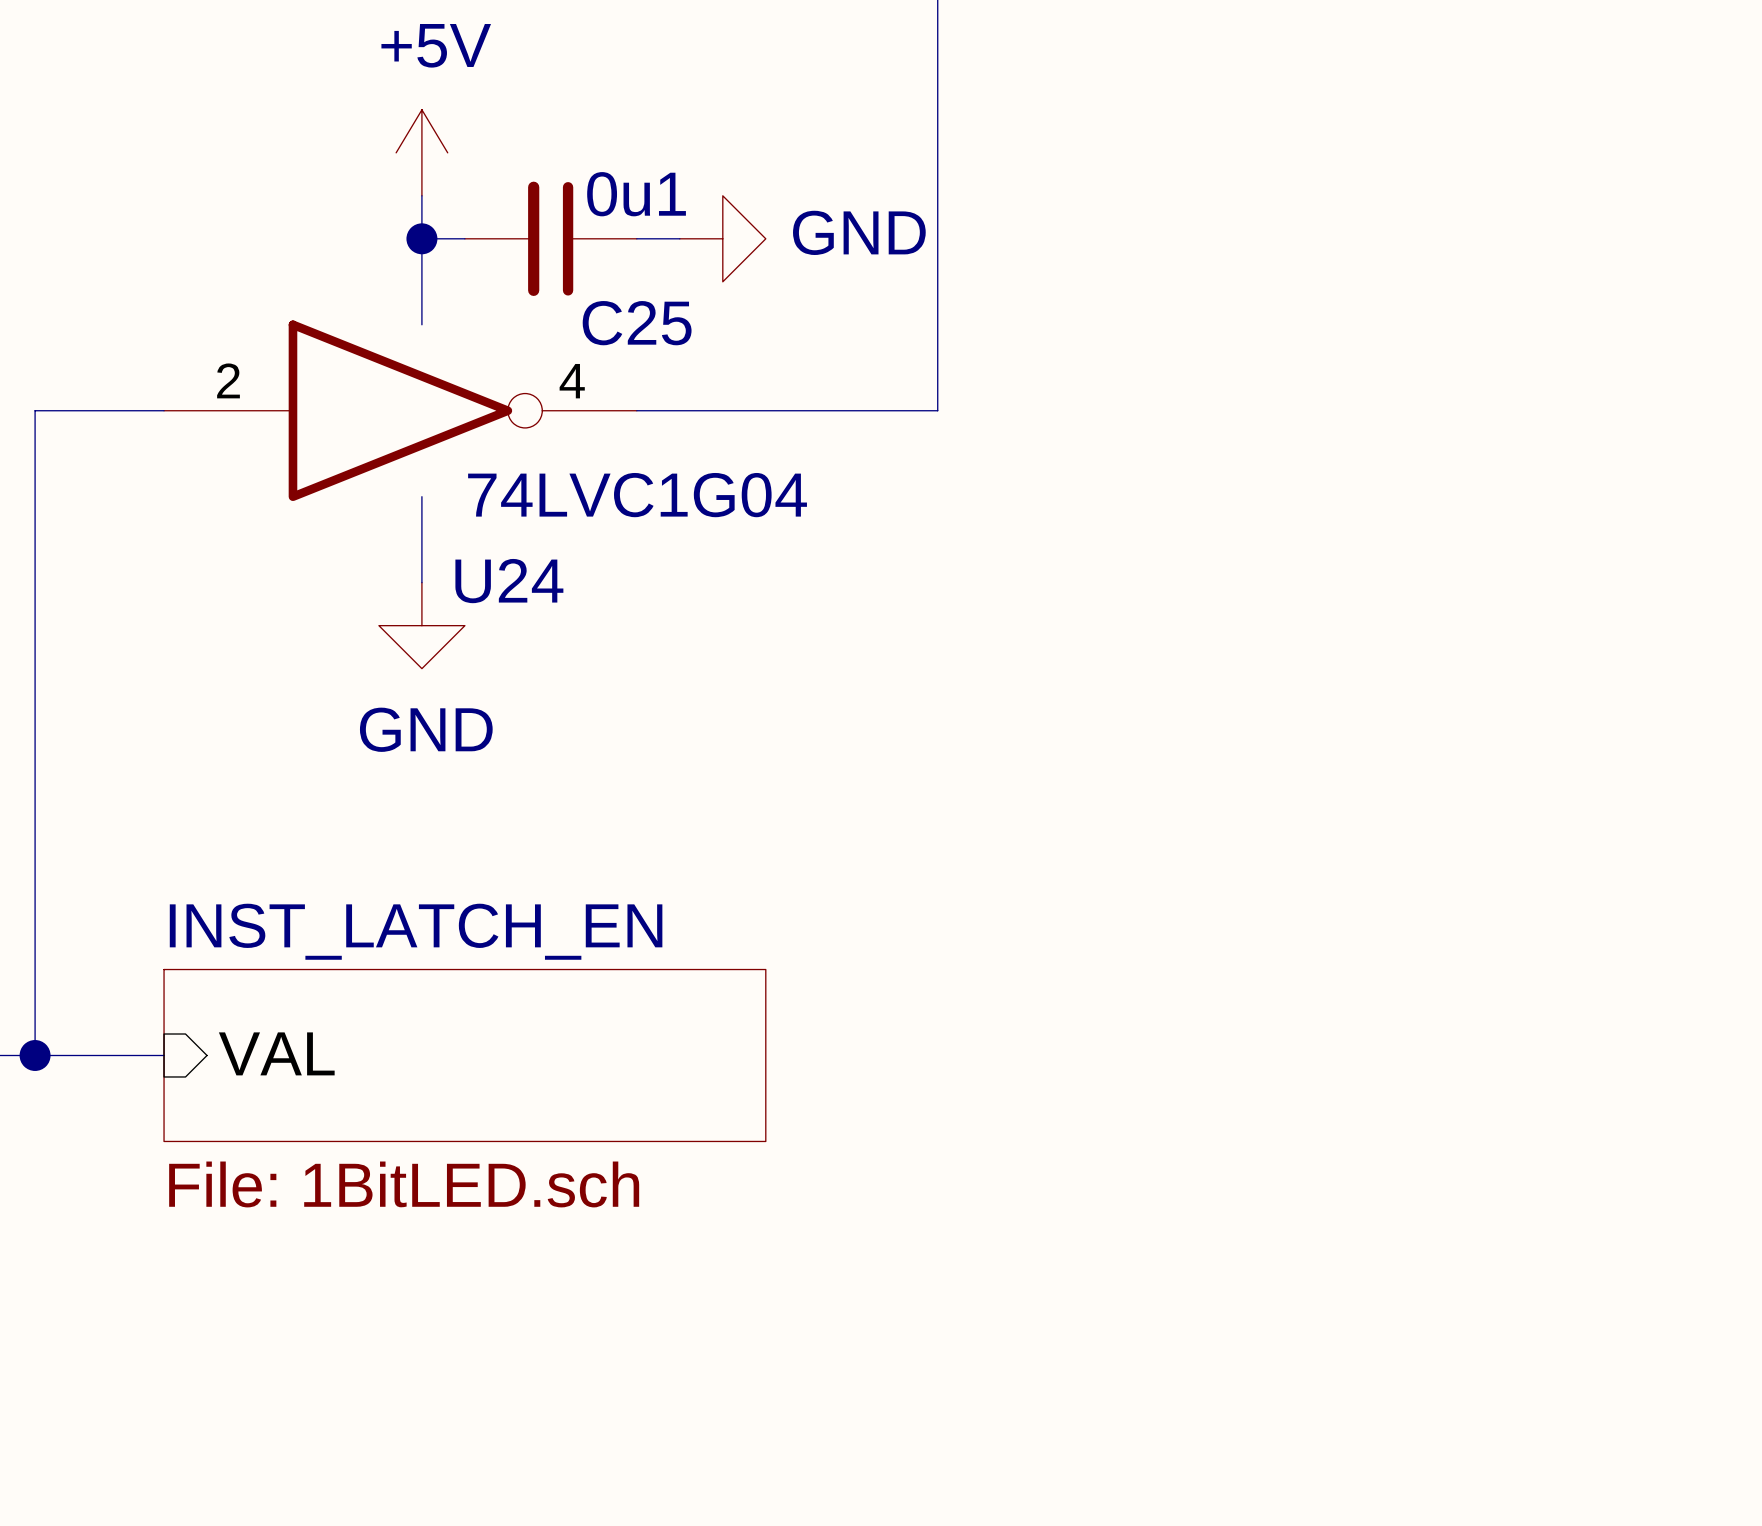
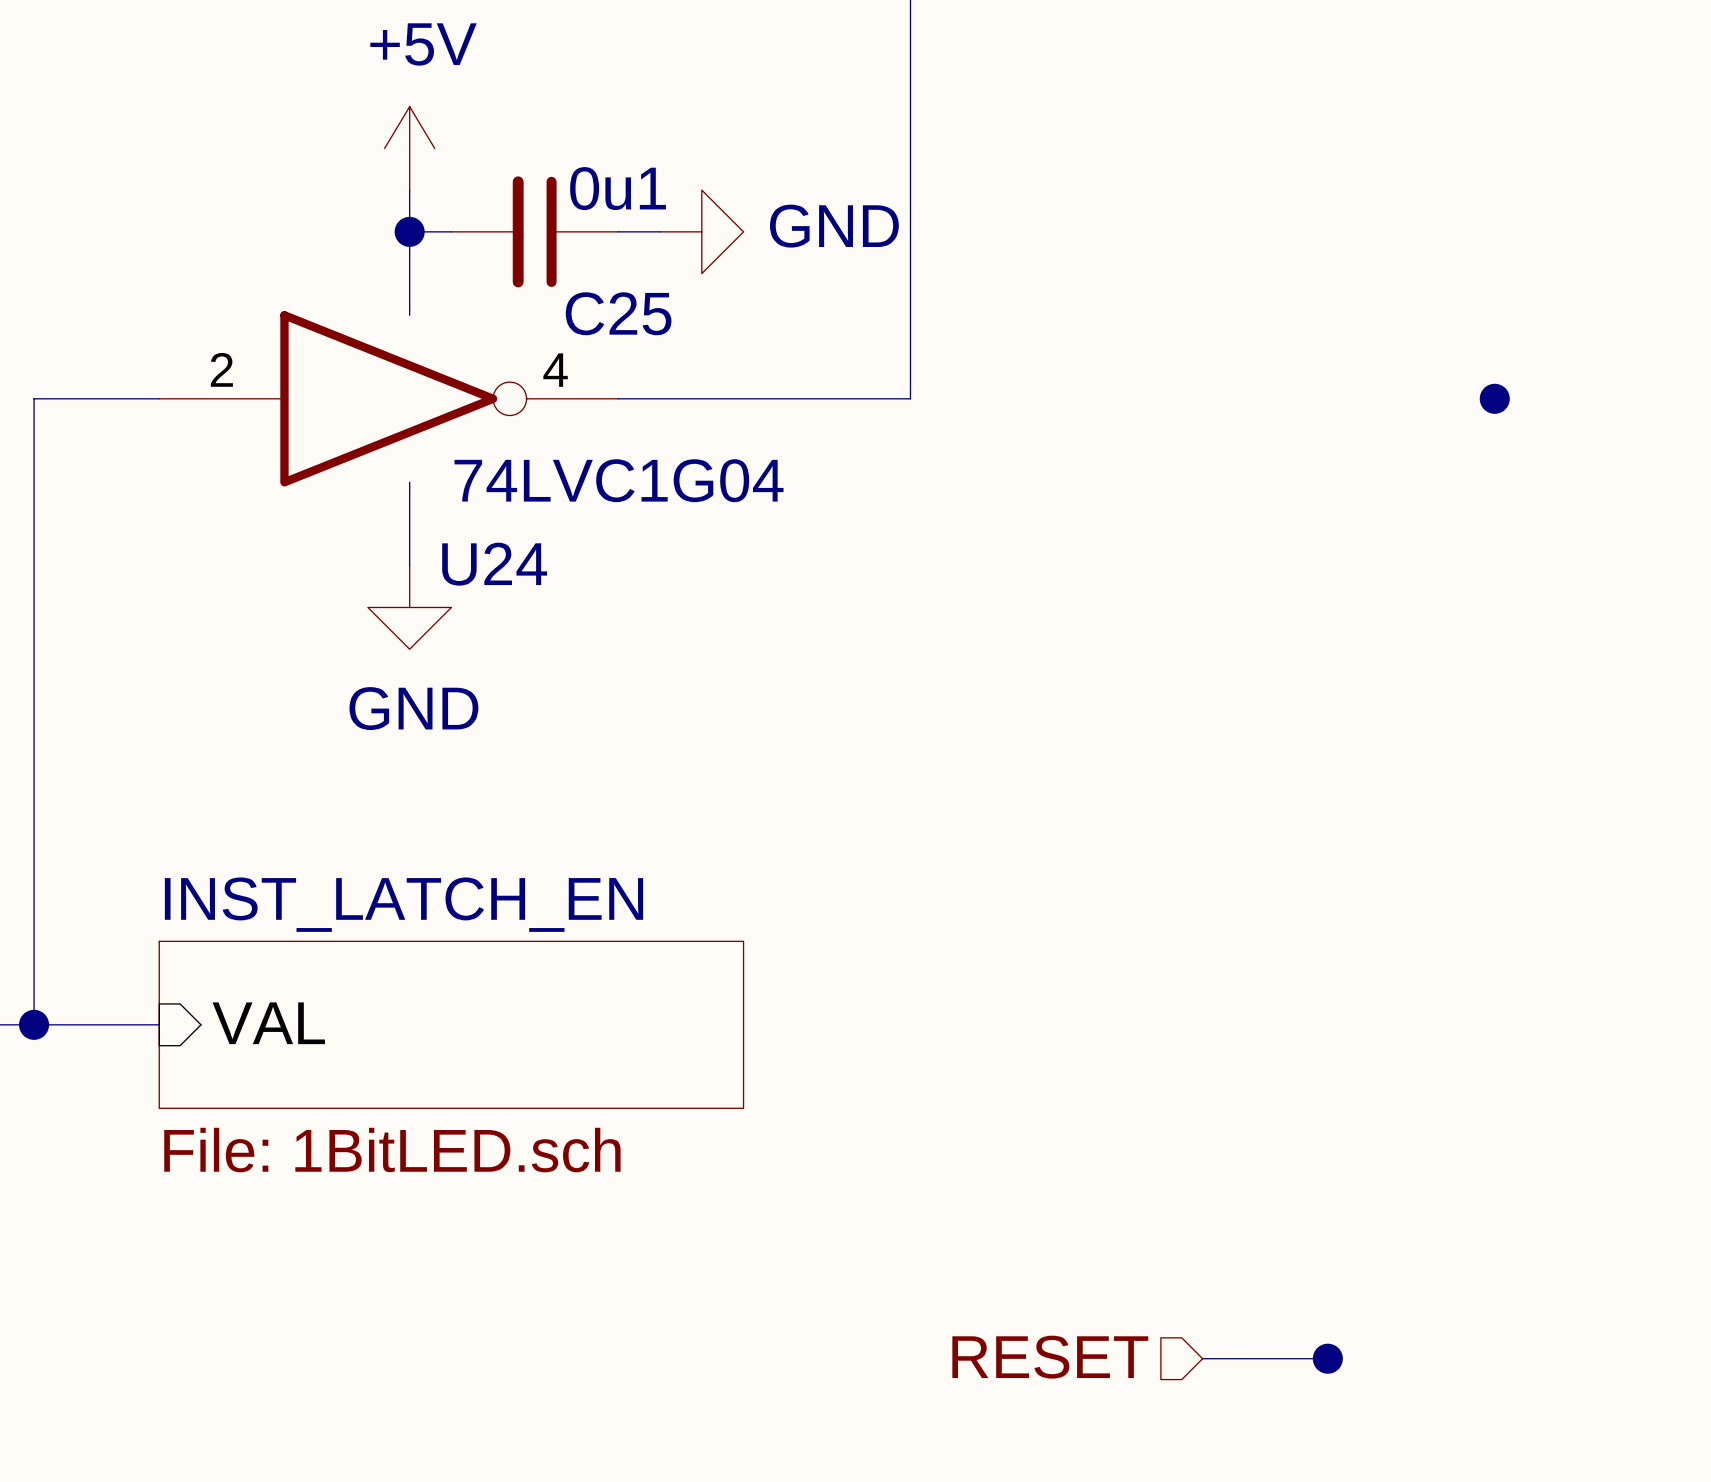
junction: none -> (1494, 398)
hierarchical label: none -> RESET (1050, 1357)
wire: none -> (1202, 1358) (1327, 1358)
junction: none -> (1327, 1358)

